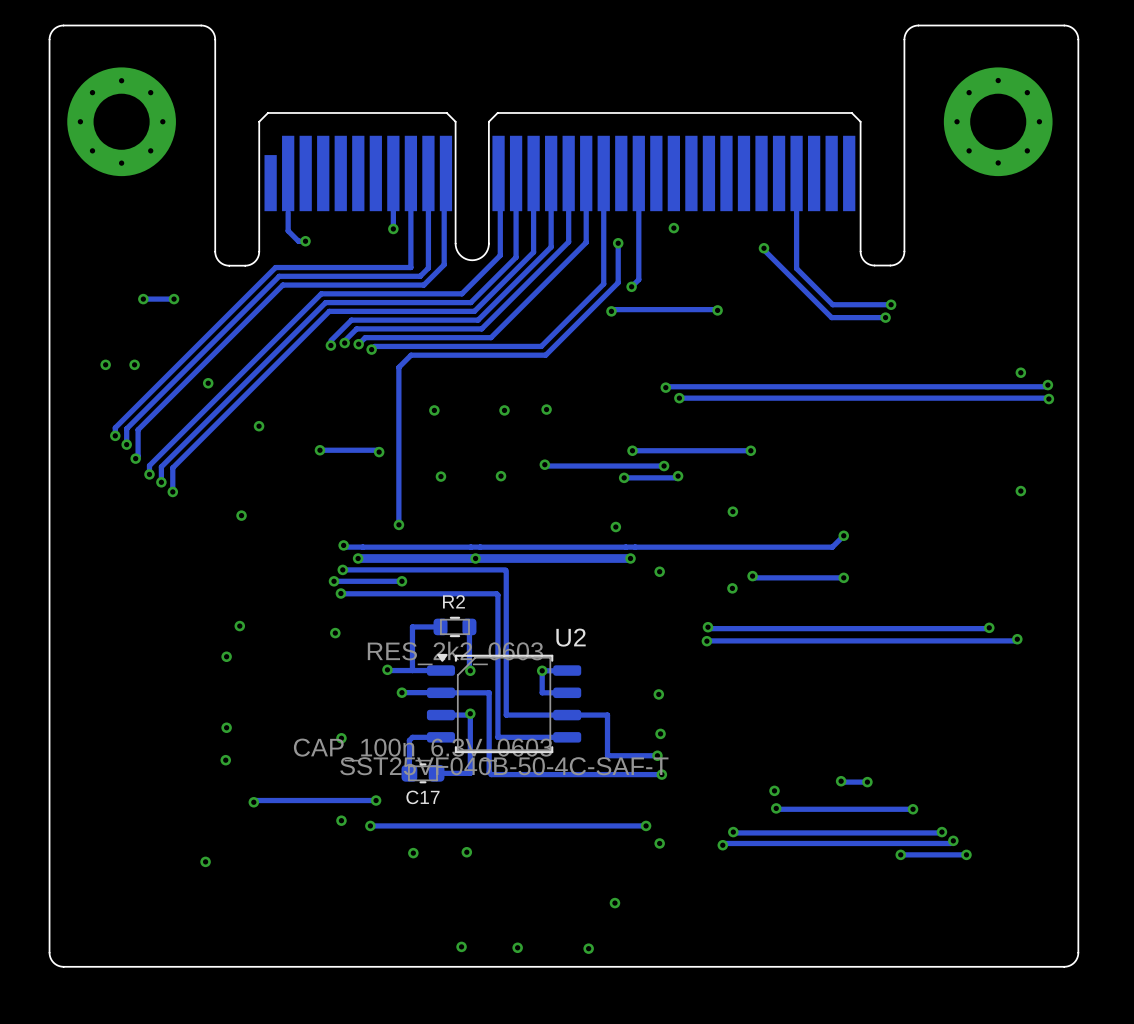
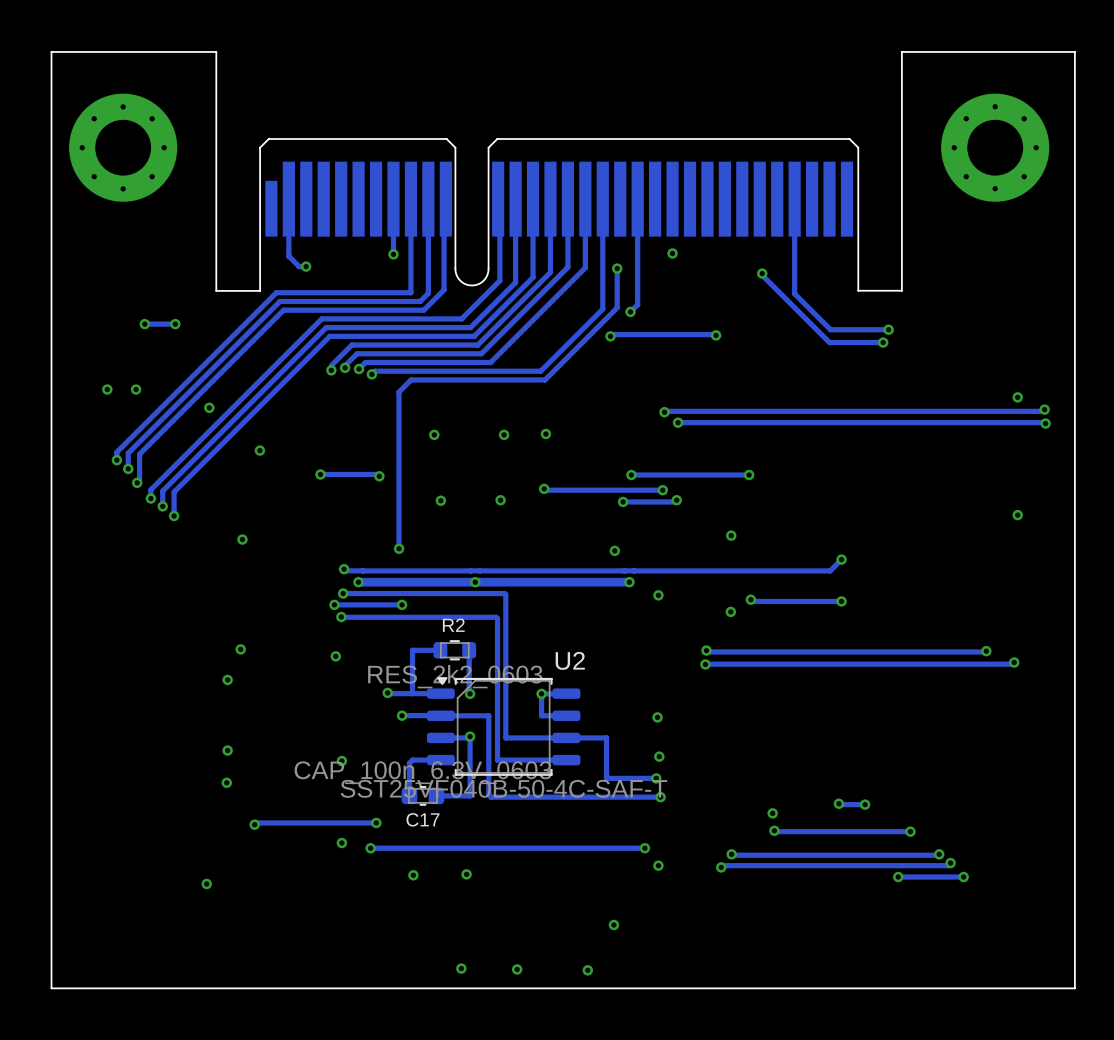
part footprint: [48, 24, 1080, 968] -> [50, 51, 1076, 990]

